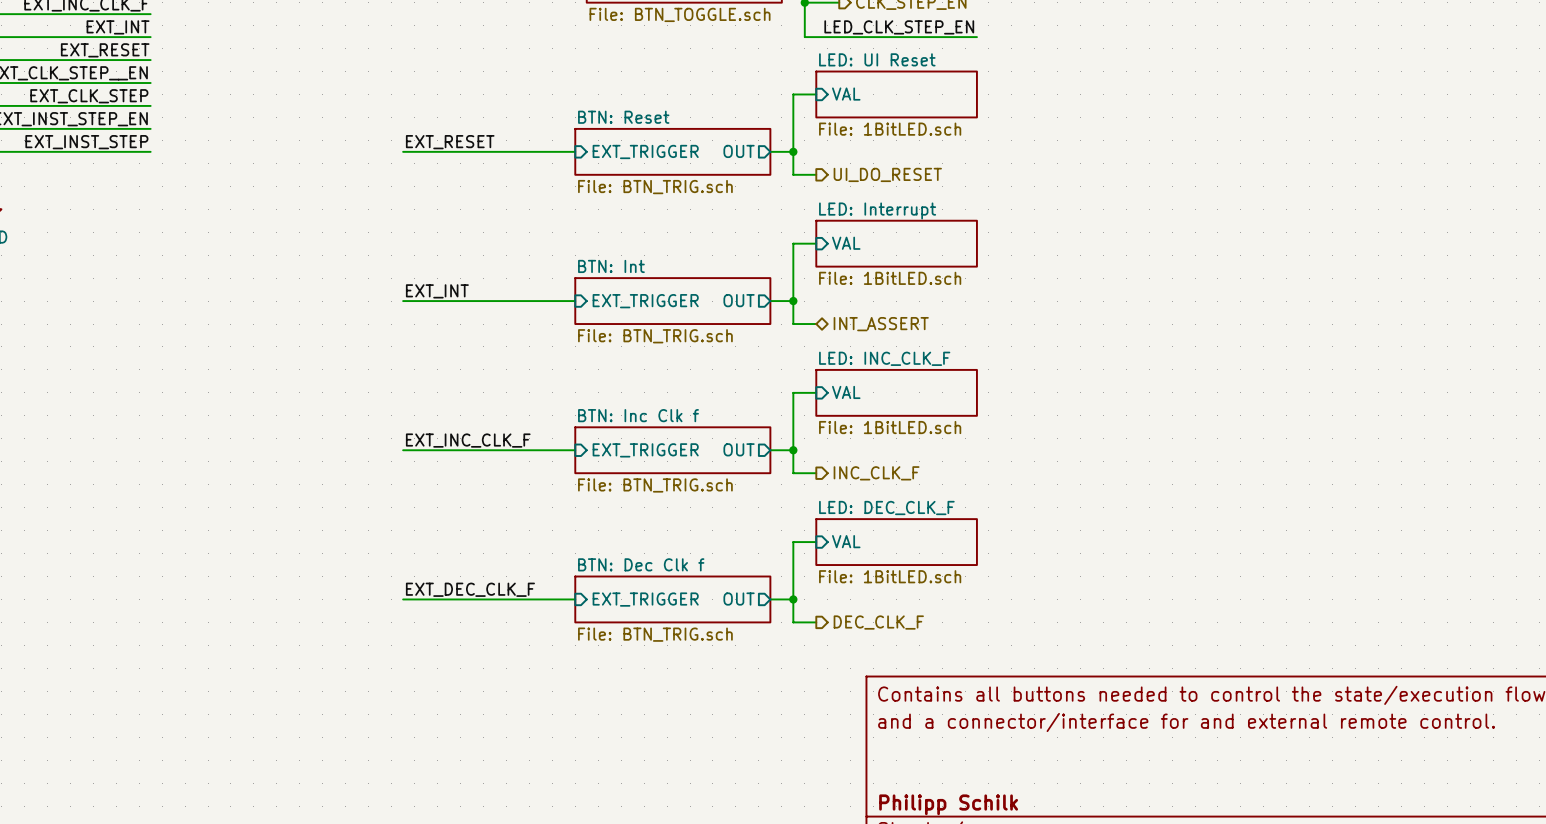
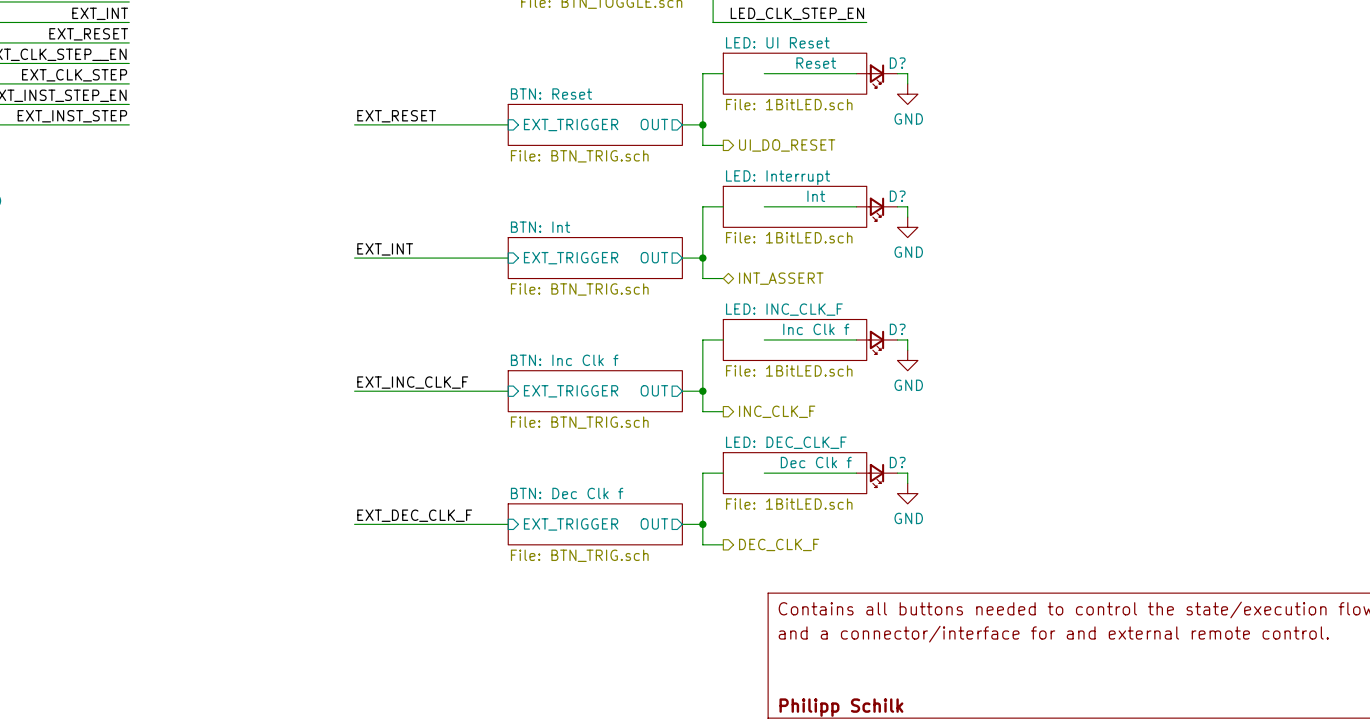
sheet pin: VAL (846, 94) -> none
wire: none -> (764, 73) (856, 73)
wire: none -> (897, 73) (907, 73) (907, 83)
D?: none -> Reset (876, 76)
power symbol: none -> GND (907, 94)
sheet pin: VAL (846, 243) -> none
wire: none -> (764, 206) (856, 206)
wire: none -> (897, 206) (907, 206) (907, 217)
D?: none -> Int (876, 209)
power symbol: none -> GND (907, 227)
sheet pin: VAL (846, 392) -> none
wire: none -> (764, 339) (856, 339)
wire: none -> (897, 339) (907, 339) (907, 350)
D?: none -> Inc Clk f (876, 342)
power symbol: none -> GND (907, 360)
sheet pin: VAL (846, 541) -> none
wire: none -> (764, 473) (856, 473)
wire: none -> (897, 473) (907, 473) (907, 483)
D?: none -> Dec Clk f (876, 475)
power symbol: none -> GND (907, 493)

